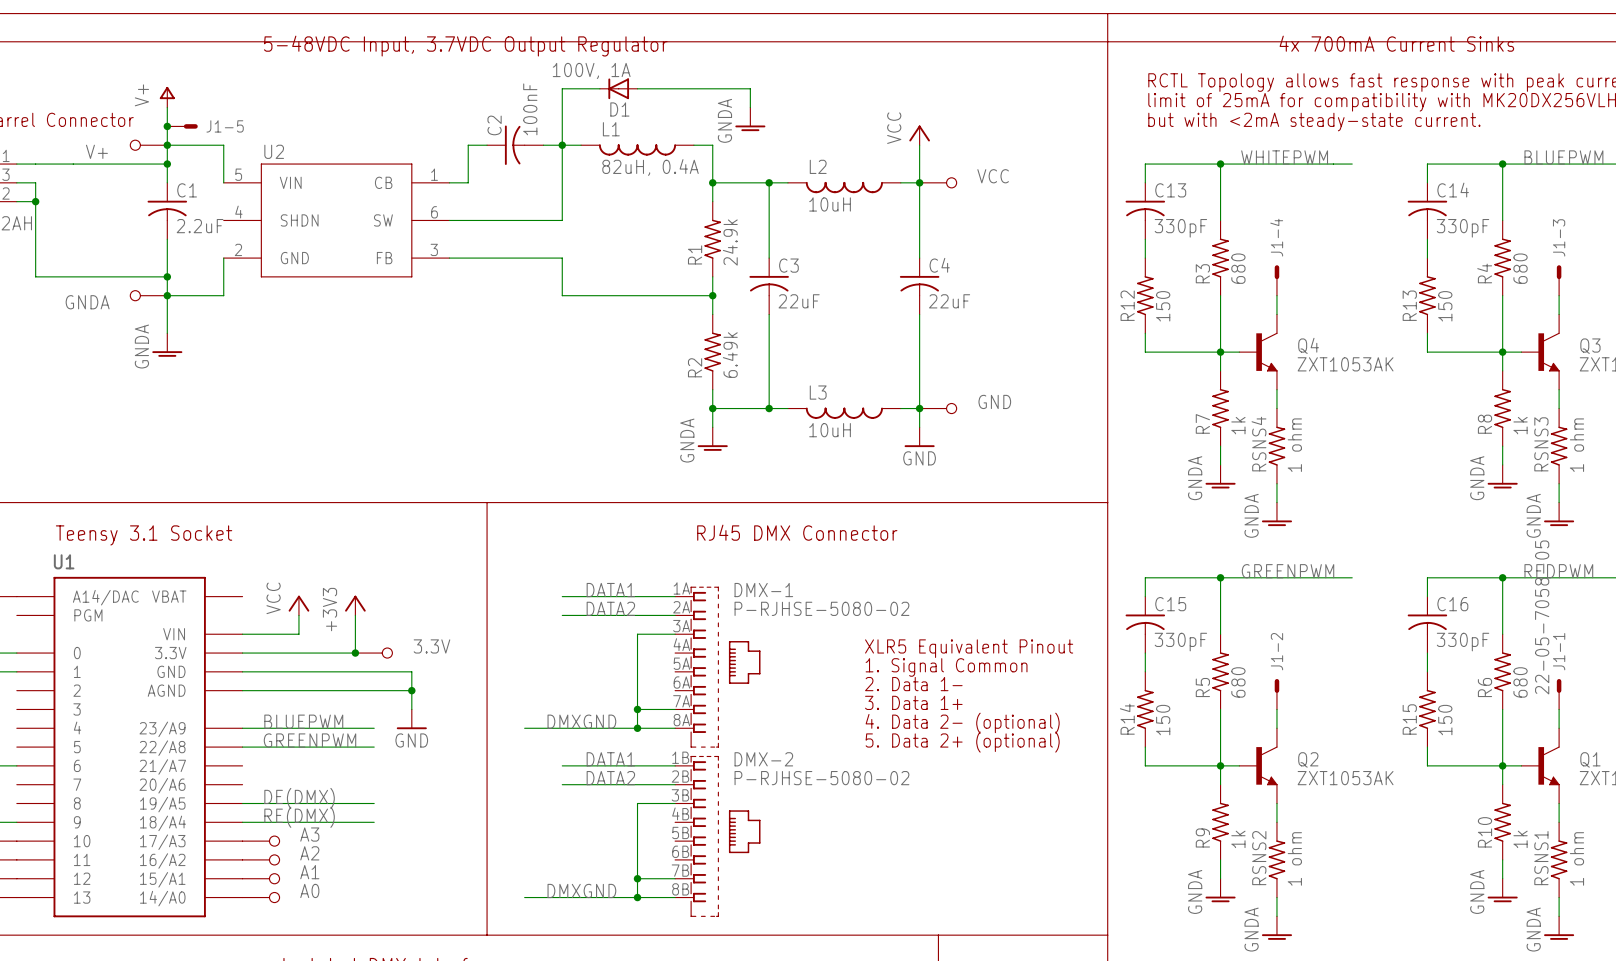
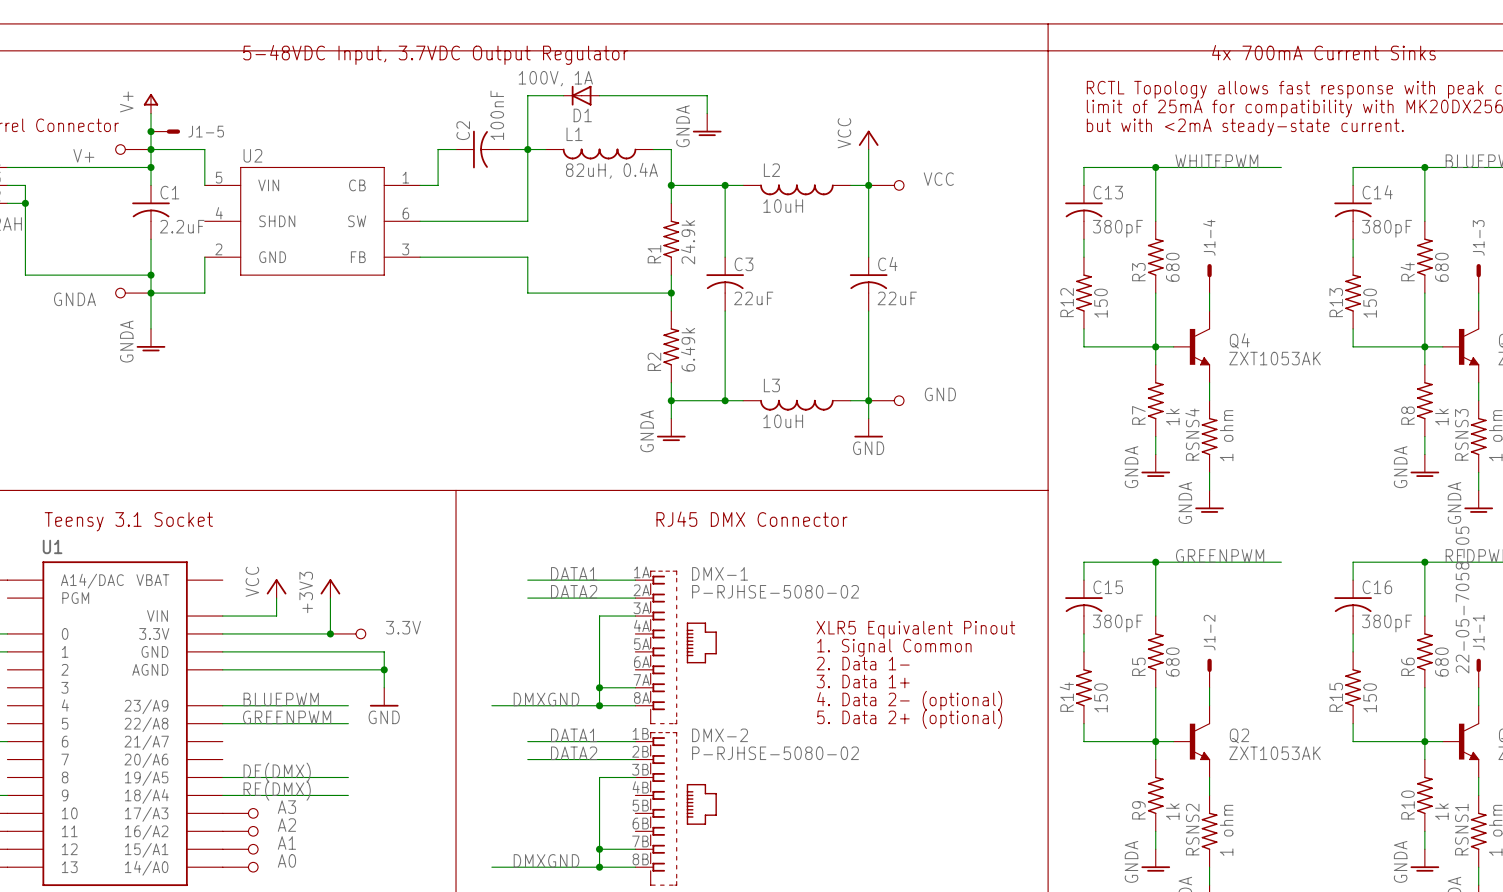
C13 value: 330pF (1180, 228) -> 380pF (1117, 228)
C14 value: 330pF (1463, 228) -> 380pF (1387, 228)
C15 value: 330pF (1180, 642) -> 380pF (1117, 623)
C16 value: 330pF (1463, 642) -> 380pF (1387, 623)

